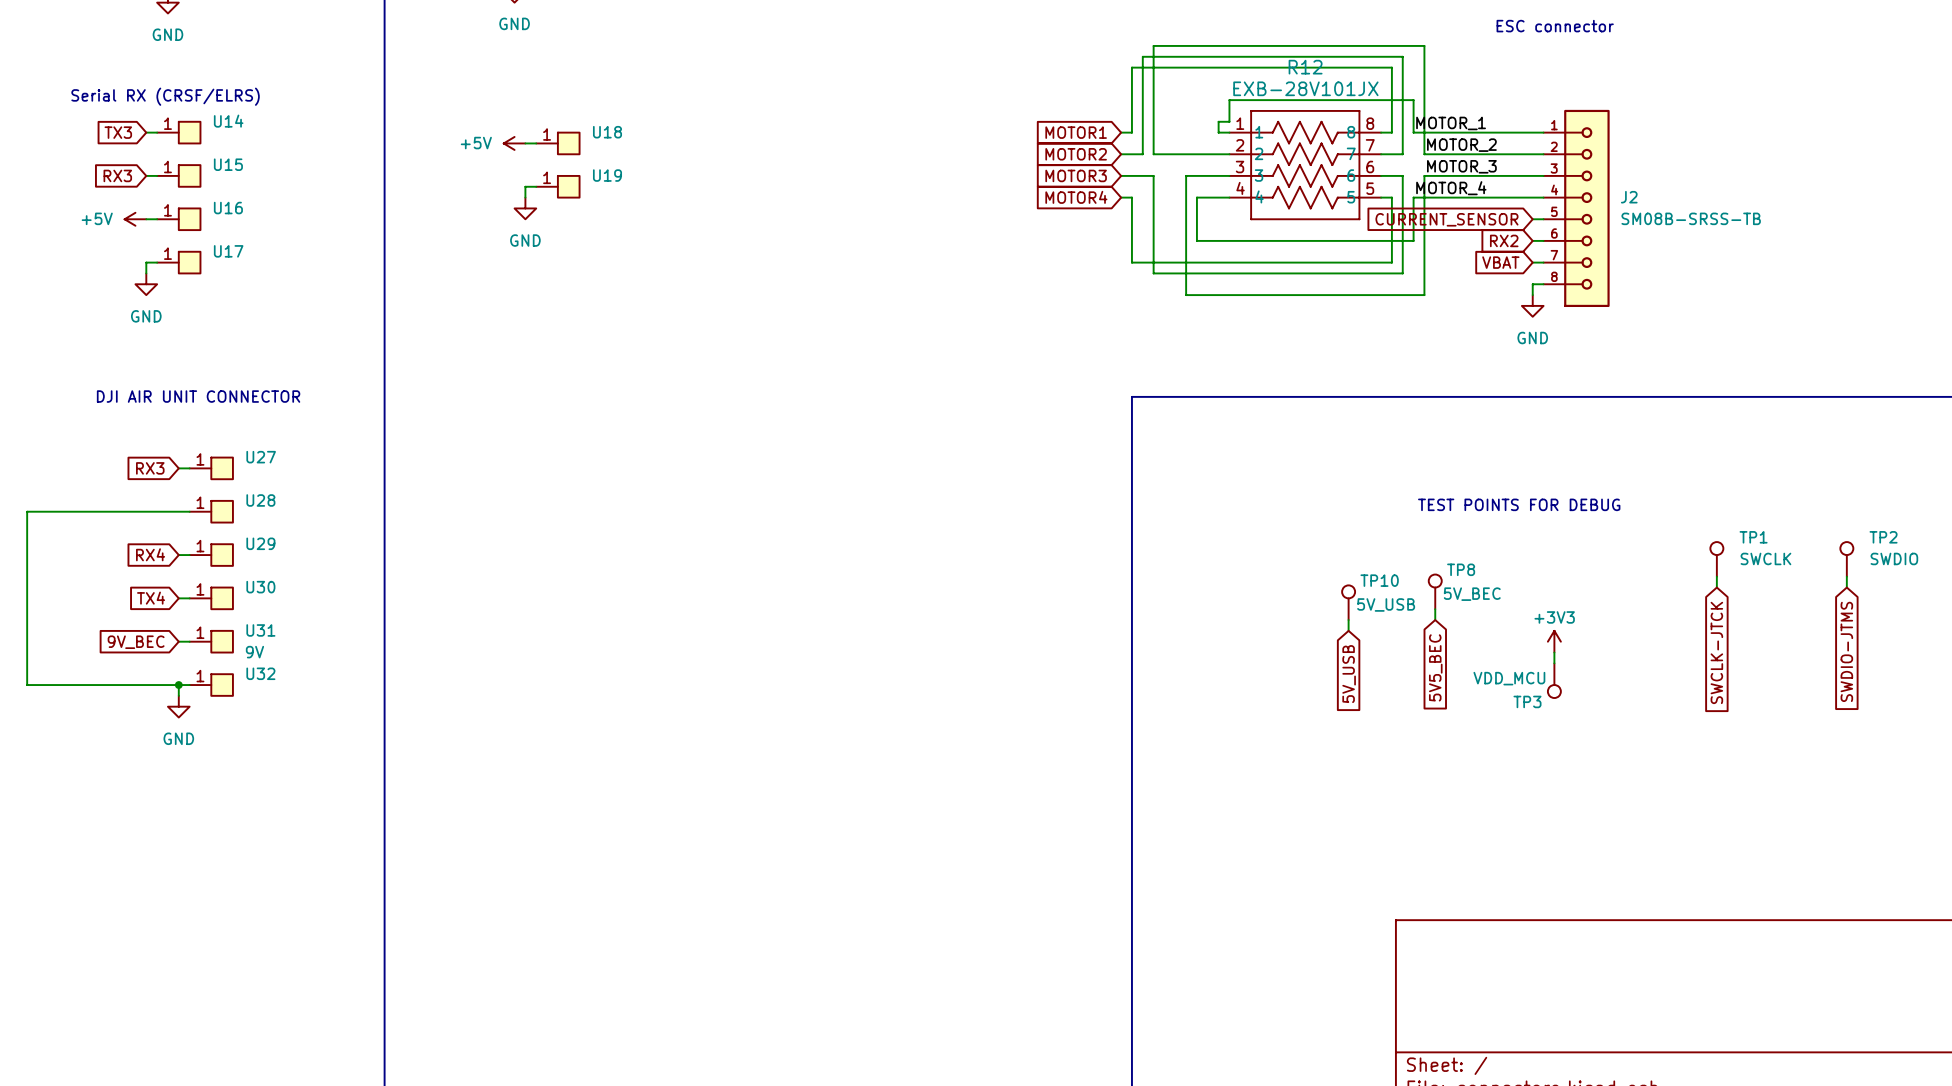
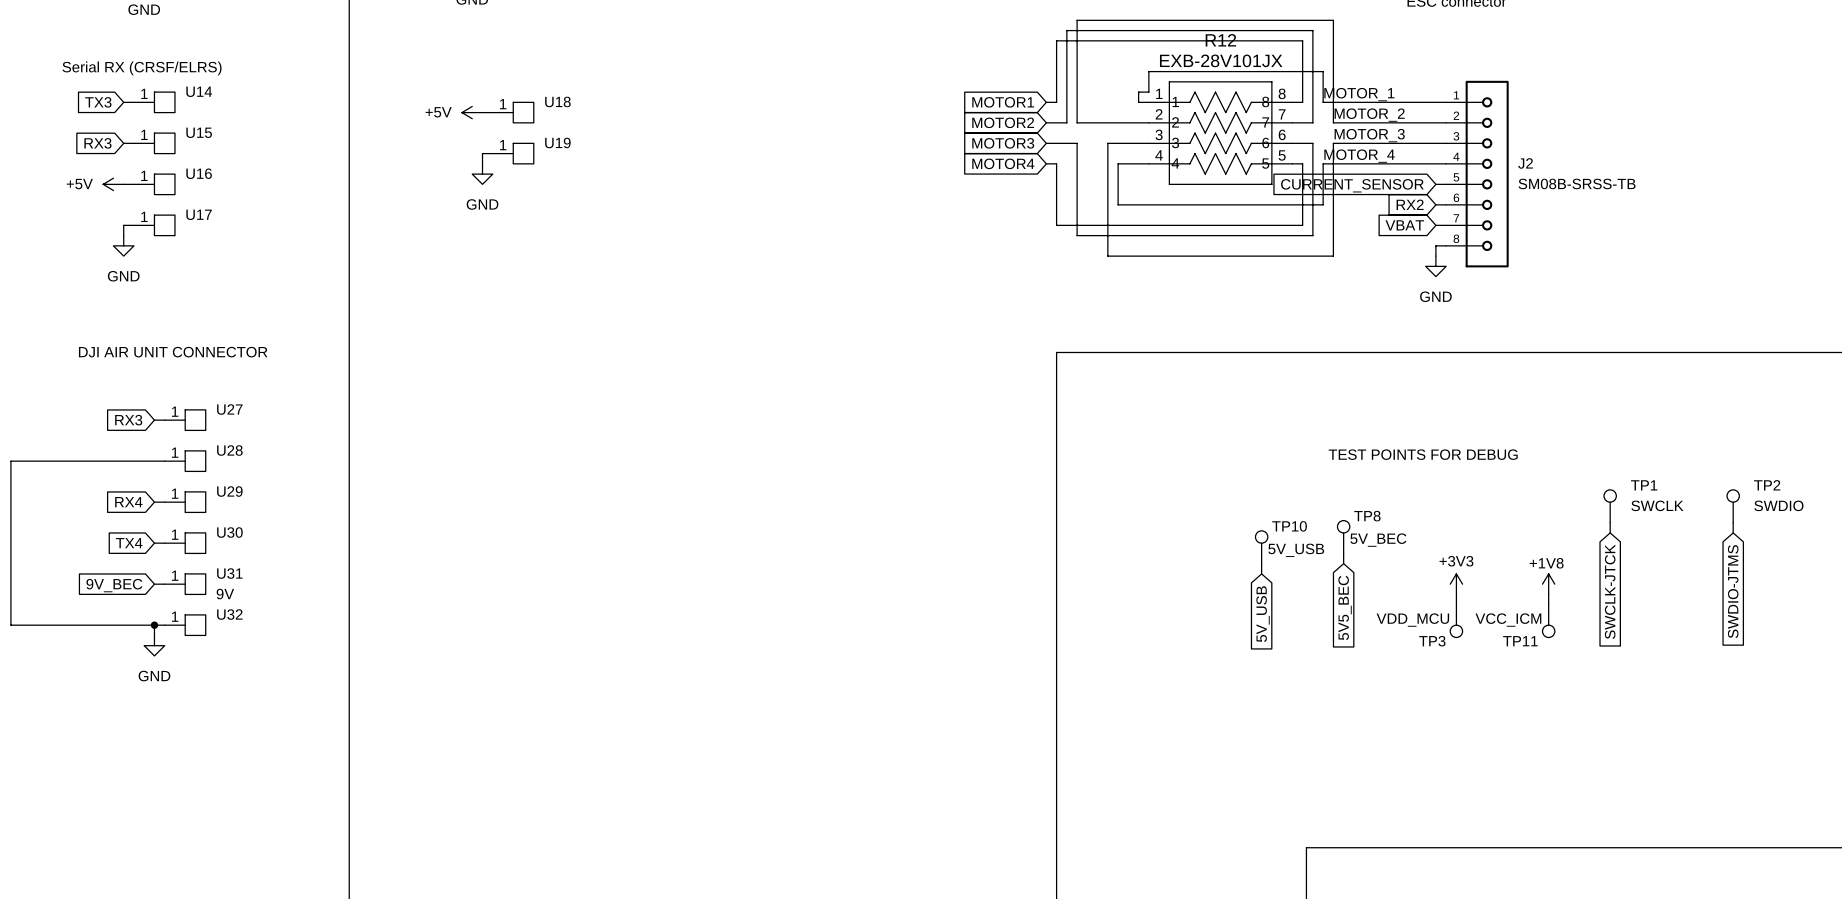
power symbol: none -> +1V8 (1548, 584)
wire: none -> (1548, 594) (1548, 604)
TP11: none -> VCC_ICM (1548, 621)

